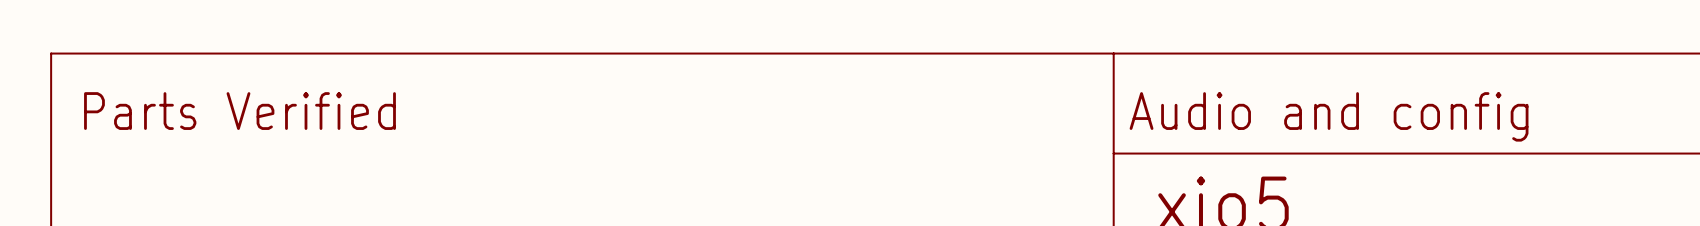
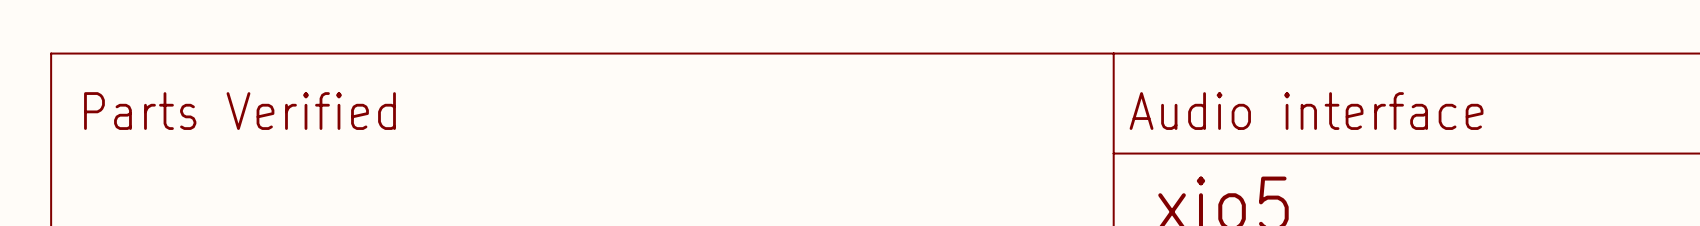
text: Audio and config (1329, 116) -> Audio interface (1306, 111)

